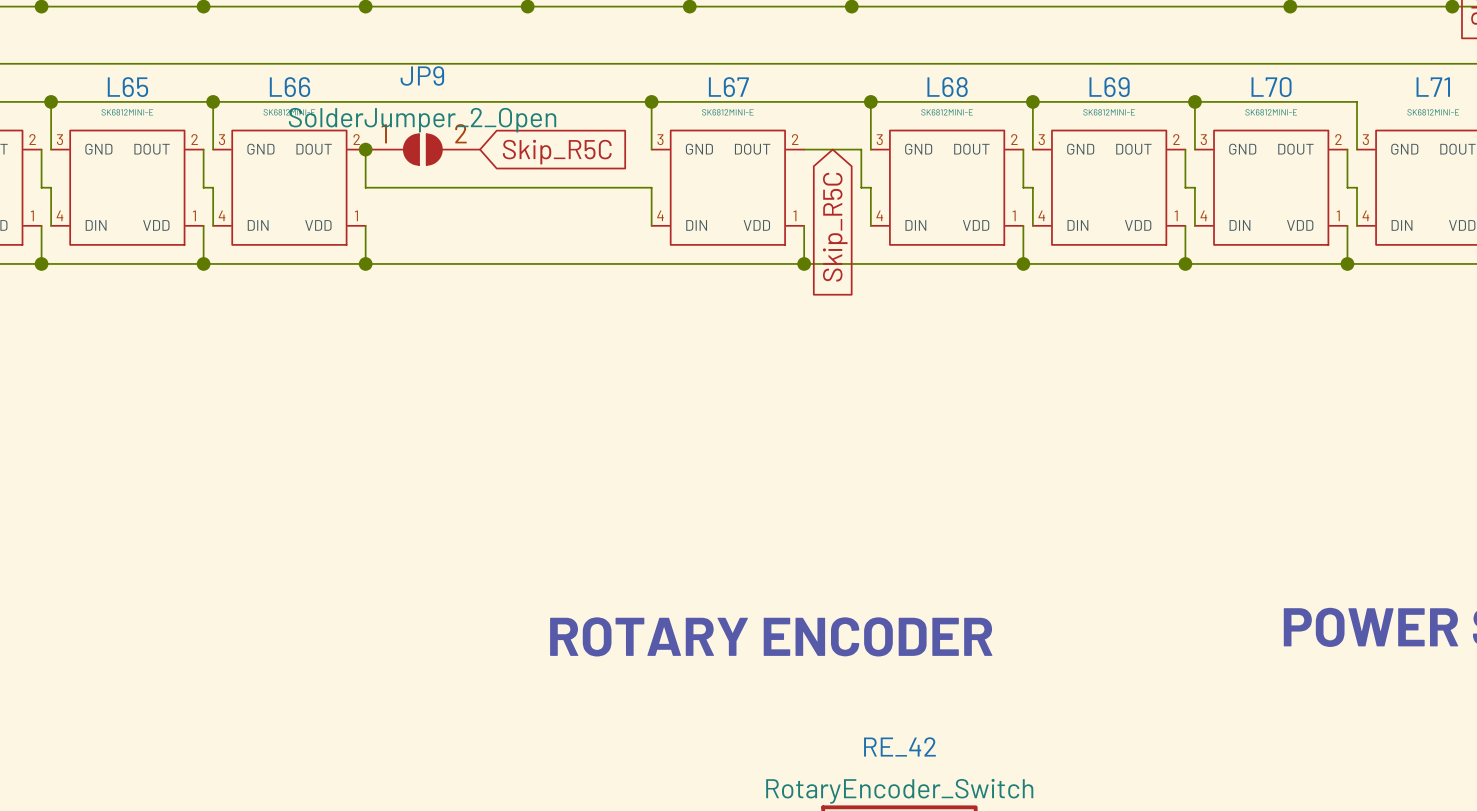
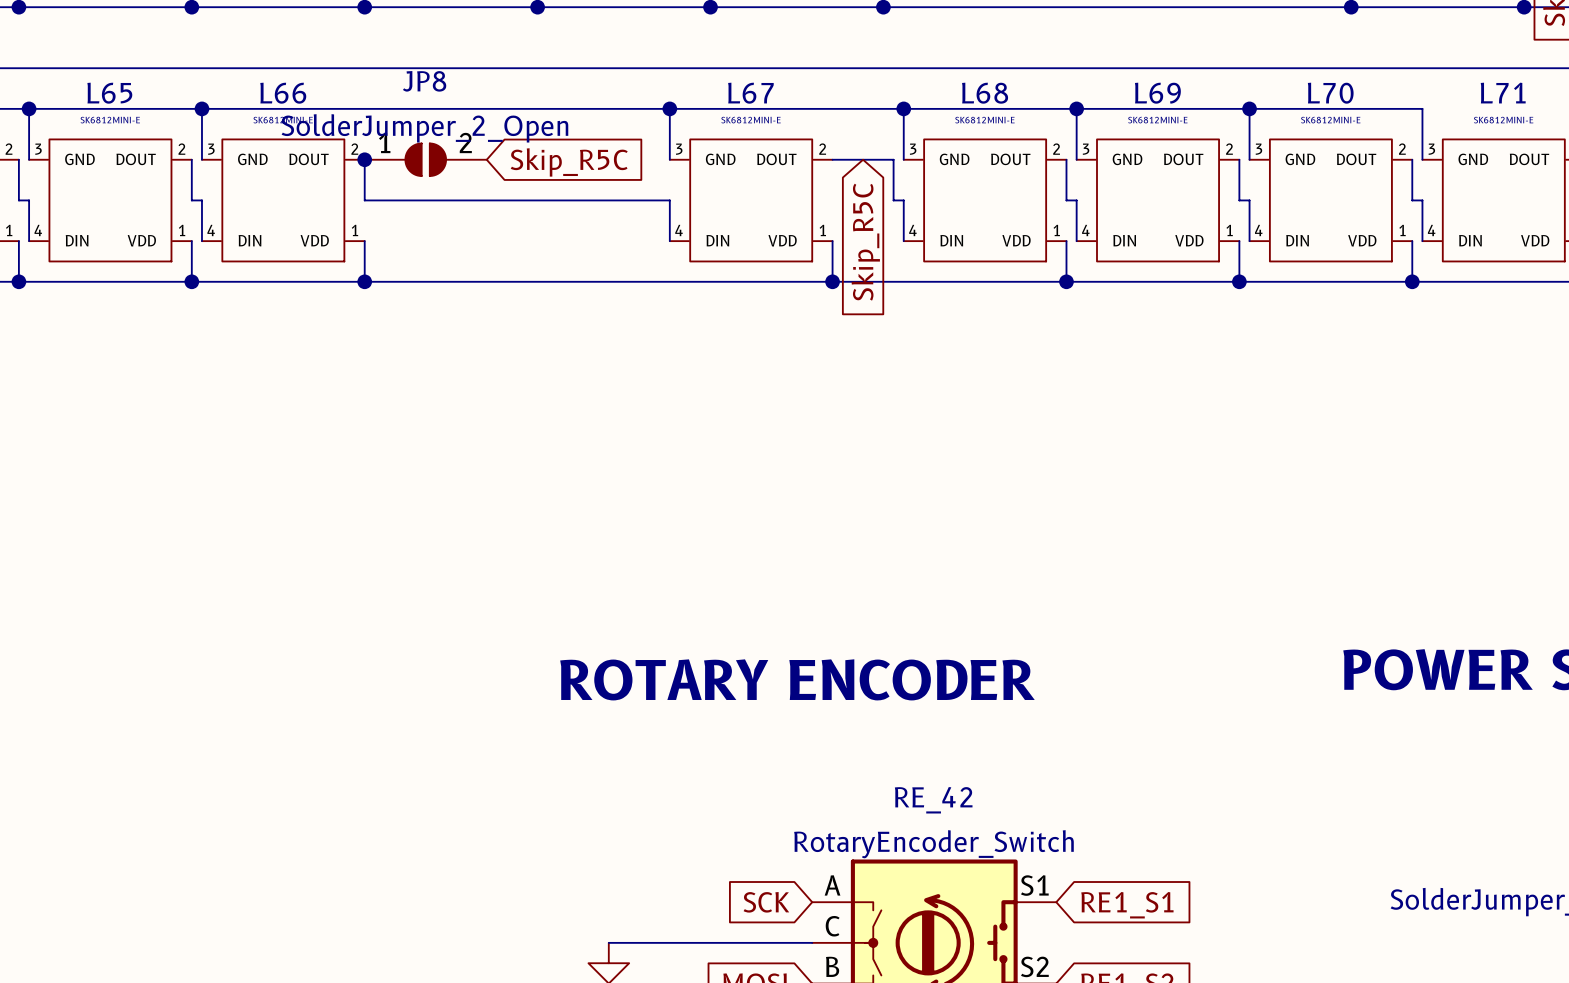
JP9 name: JP9 (422, 76) -> JP8 (424, 81)

